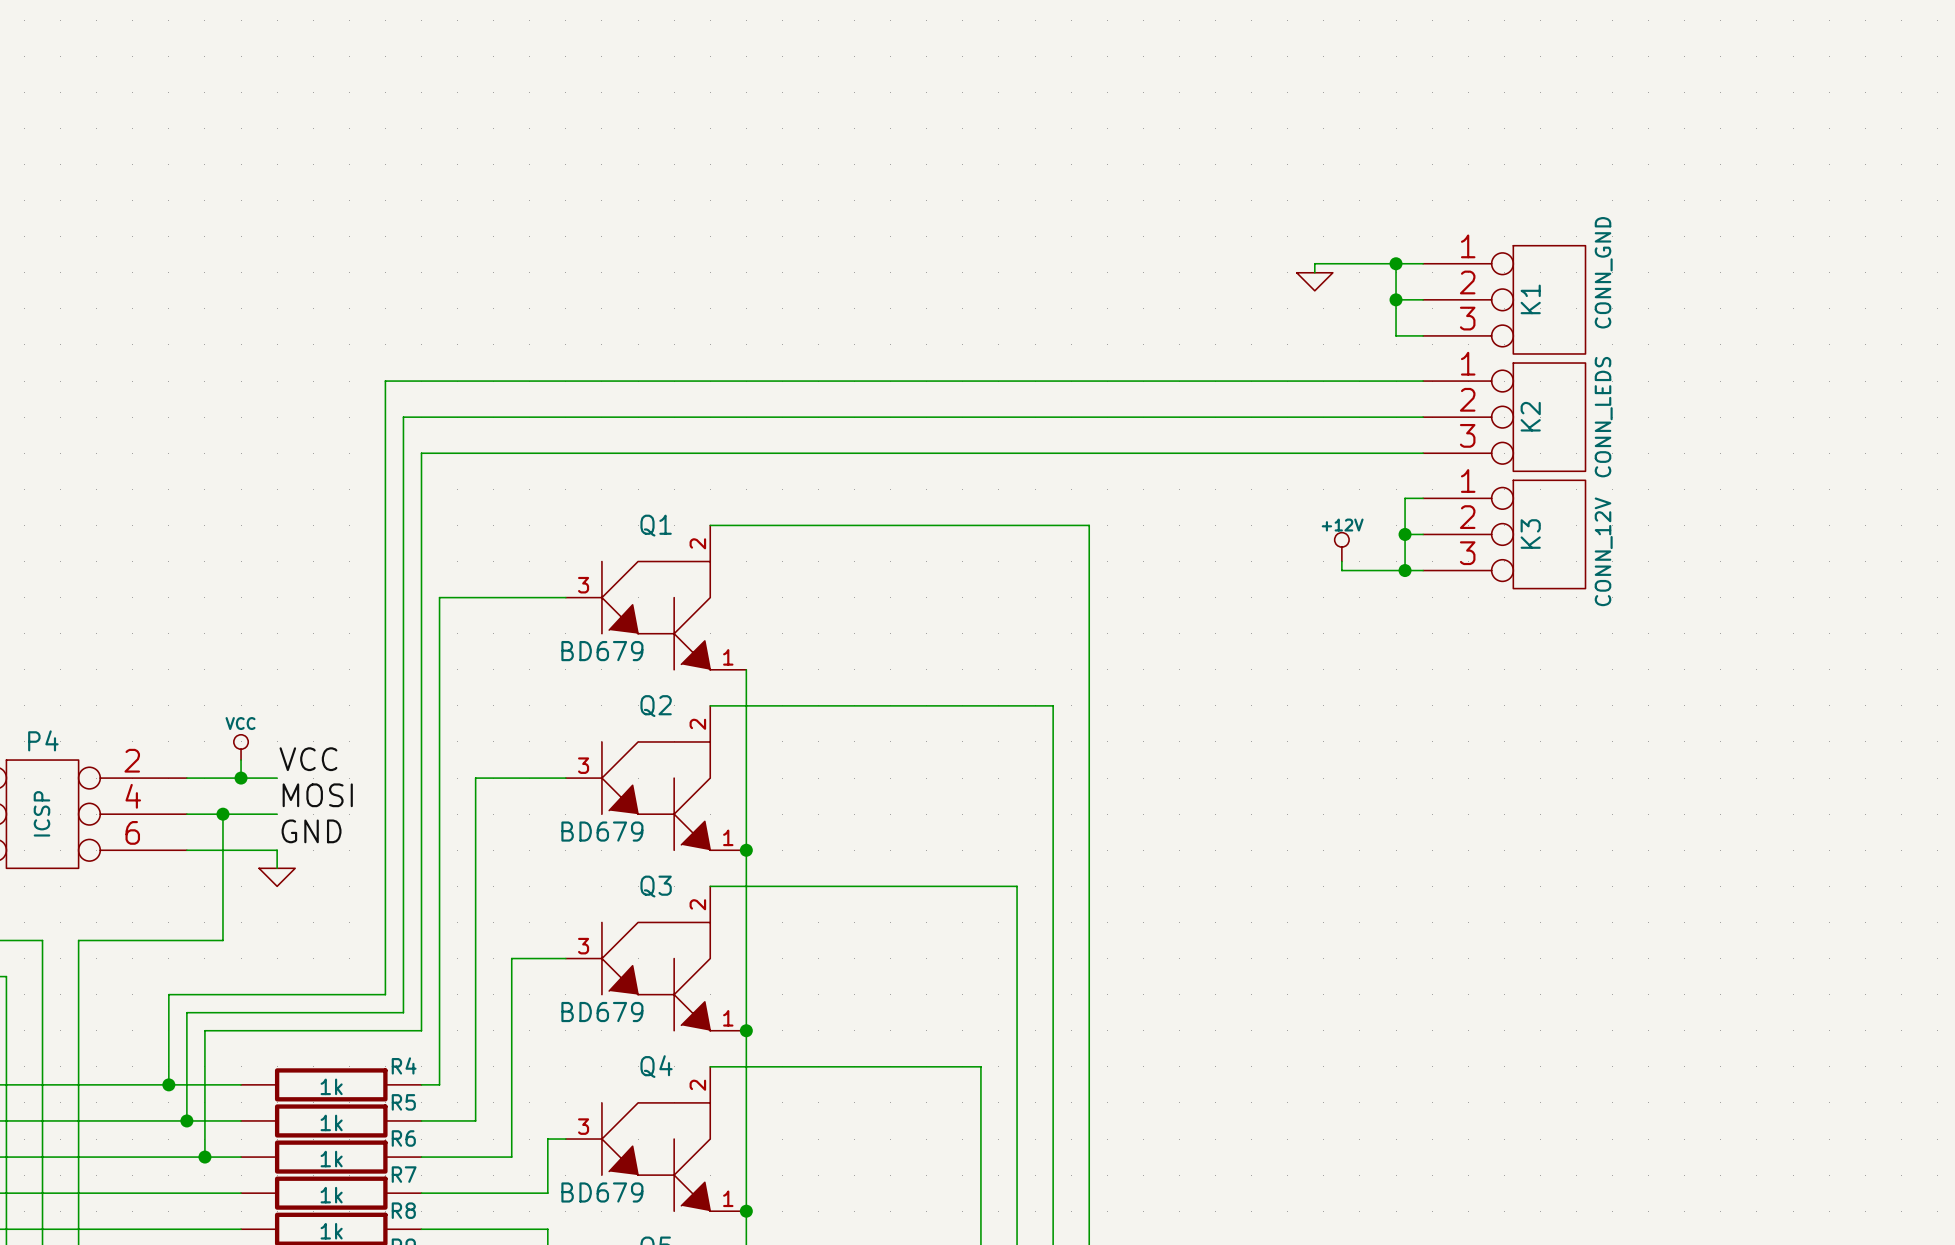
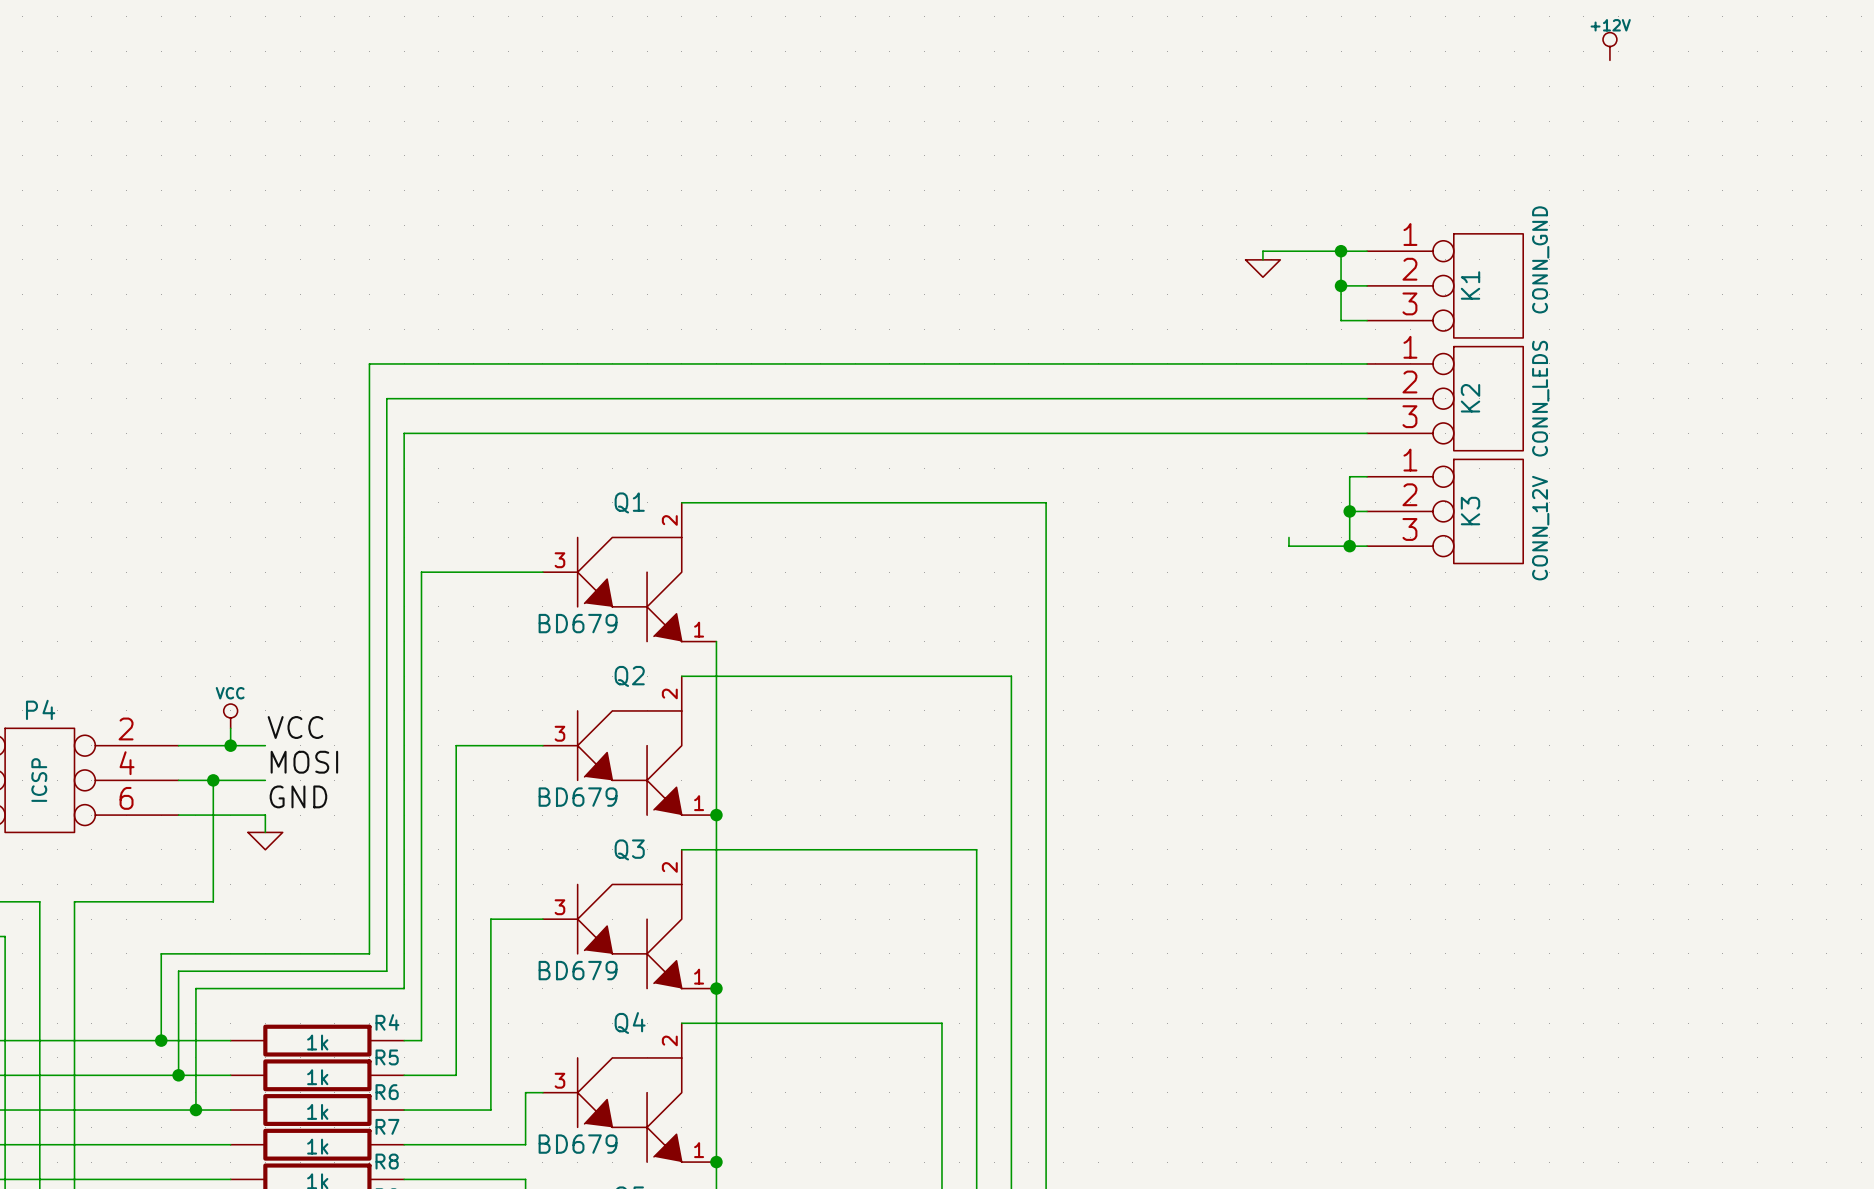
power symbol: none -> +12V (1609, 46)
power symbol: +12V (1341, 547) -> none

